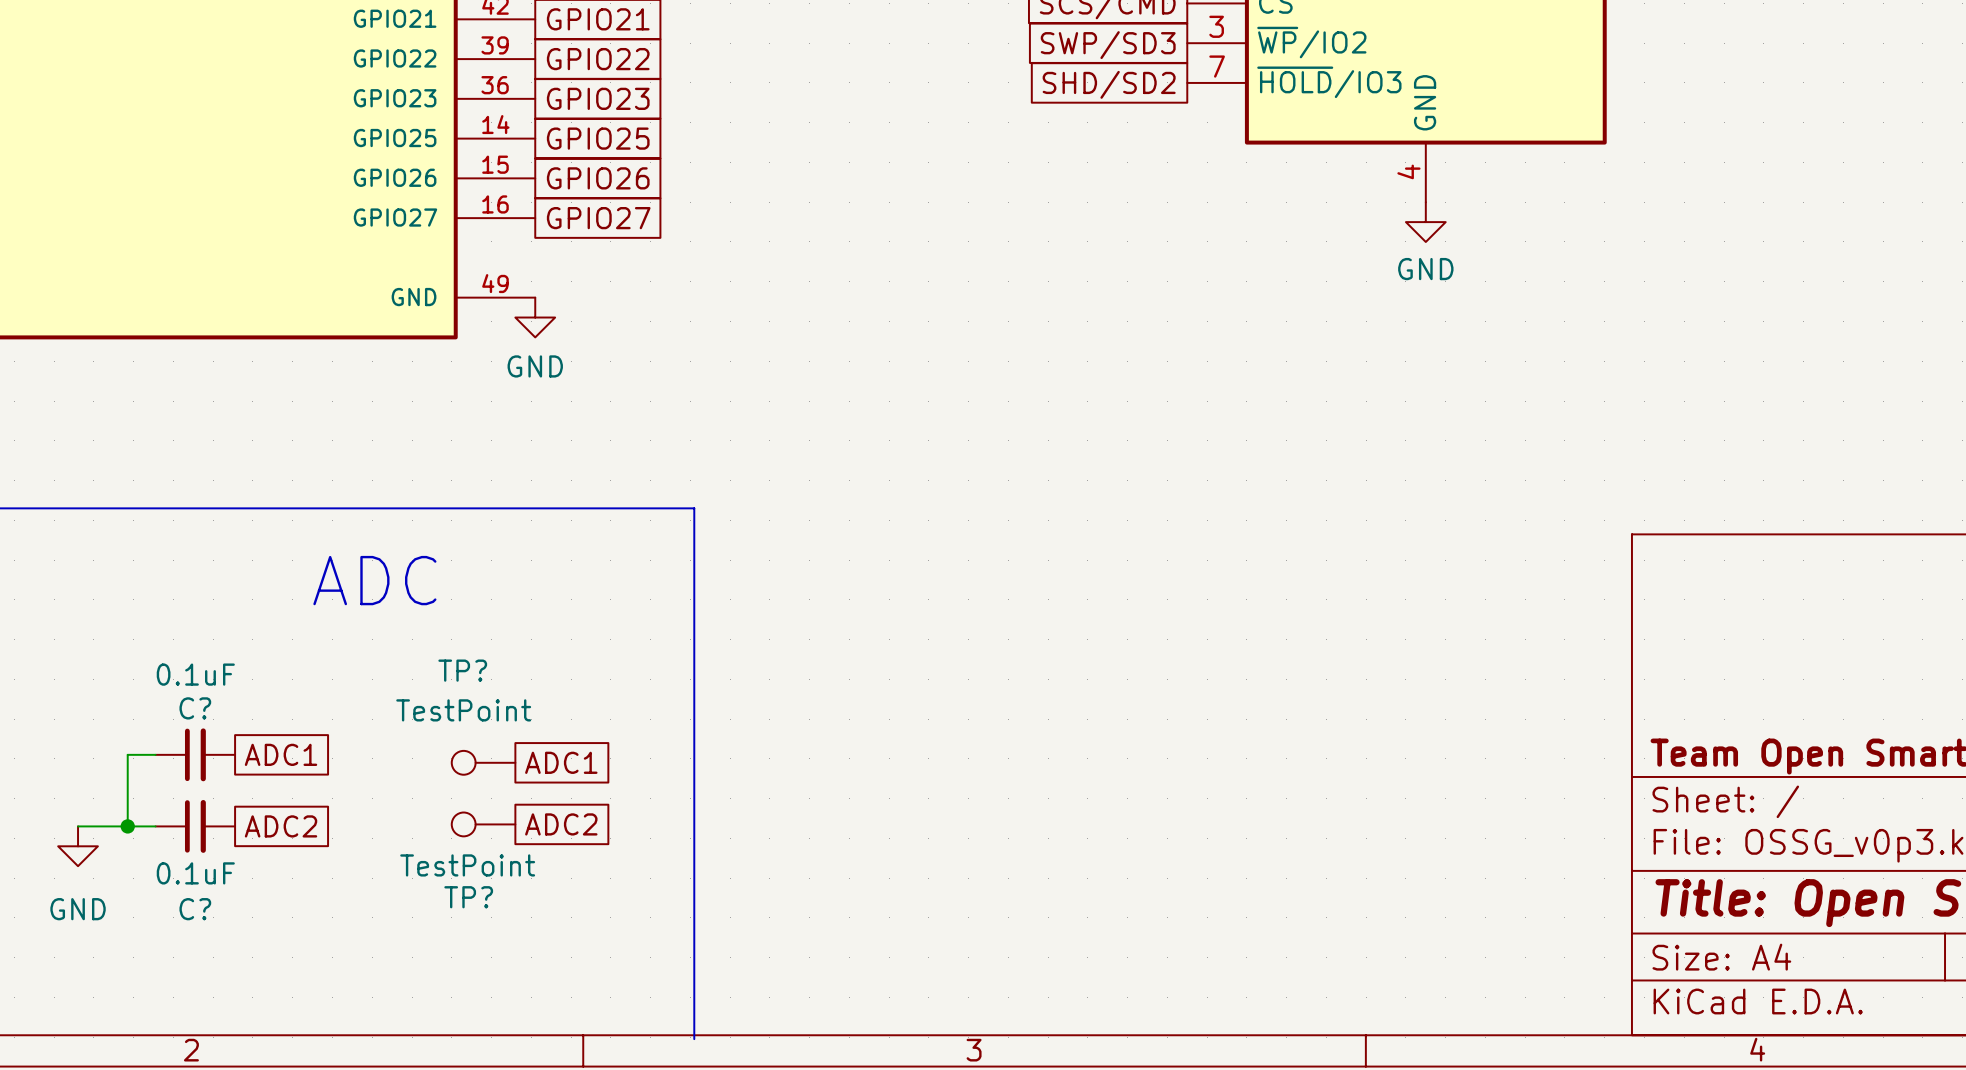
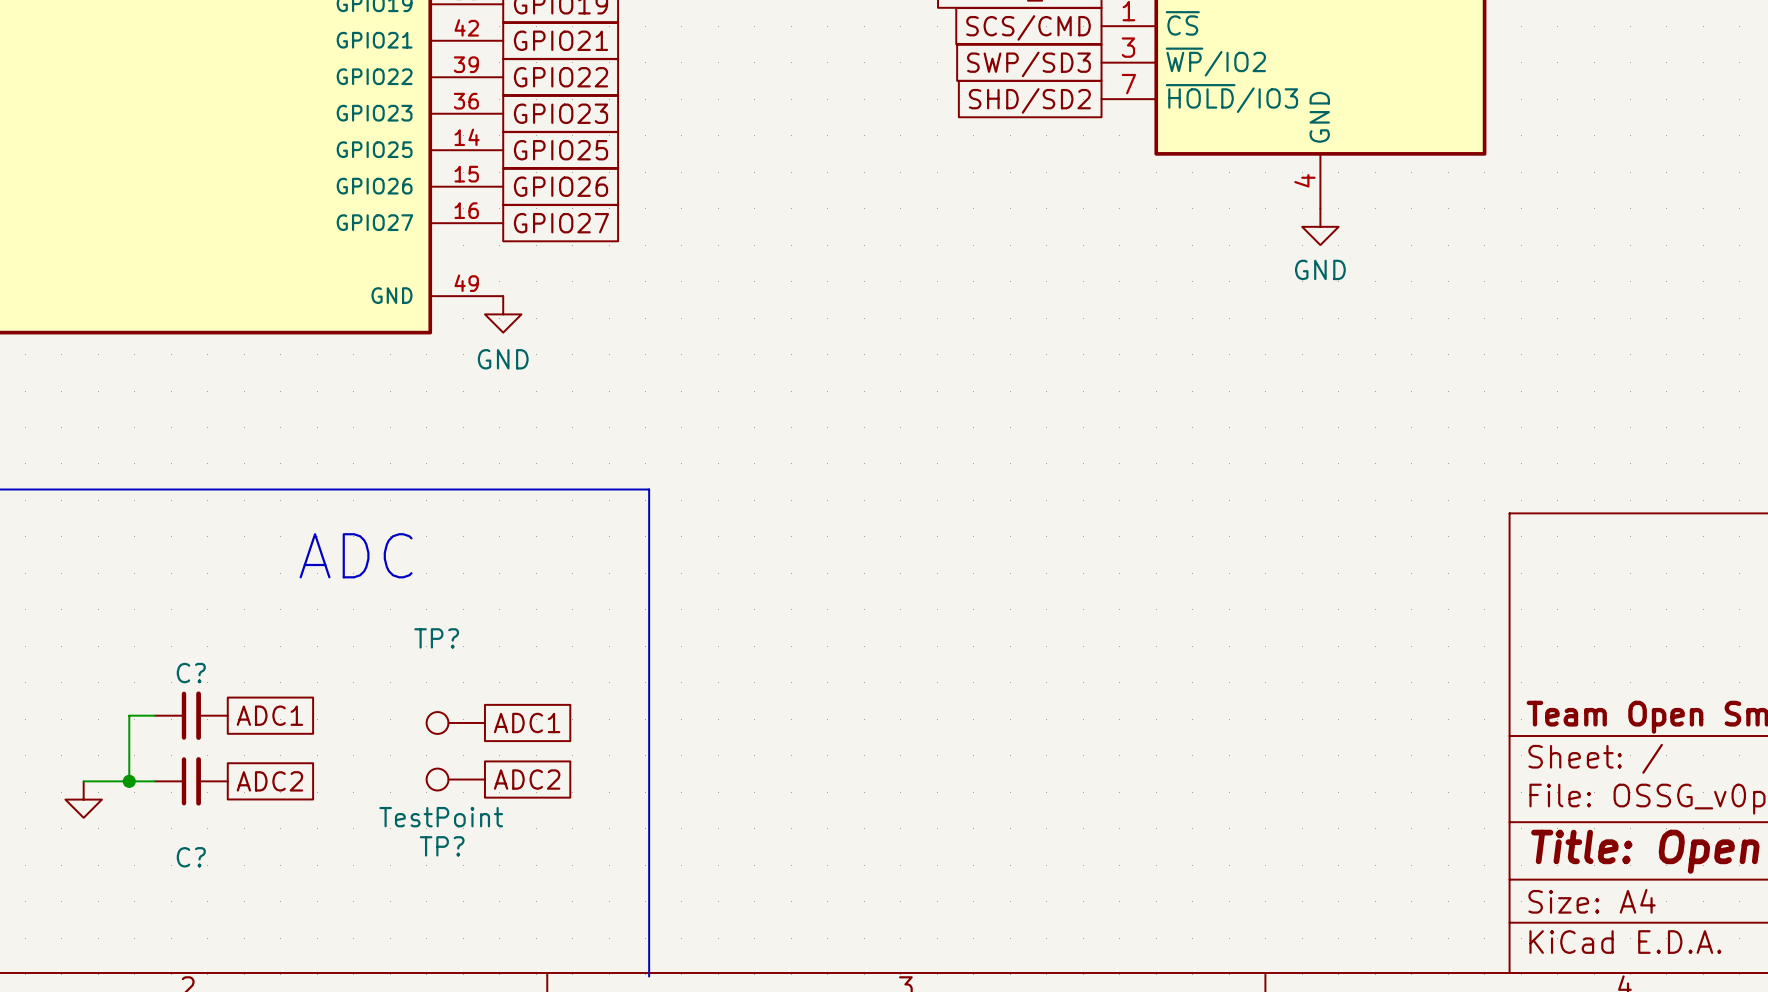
C? value: 0.1uF (195, 674) -> none
TP? value: TestPoint (463, 710) -> none
C? value: 0.1uF (195, 873) -> none
power symbol text: GND (78, 909) -> none

